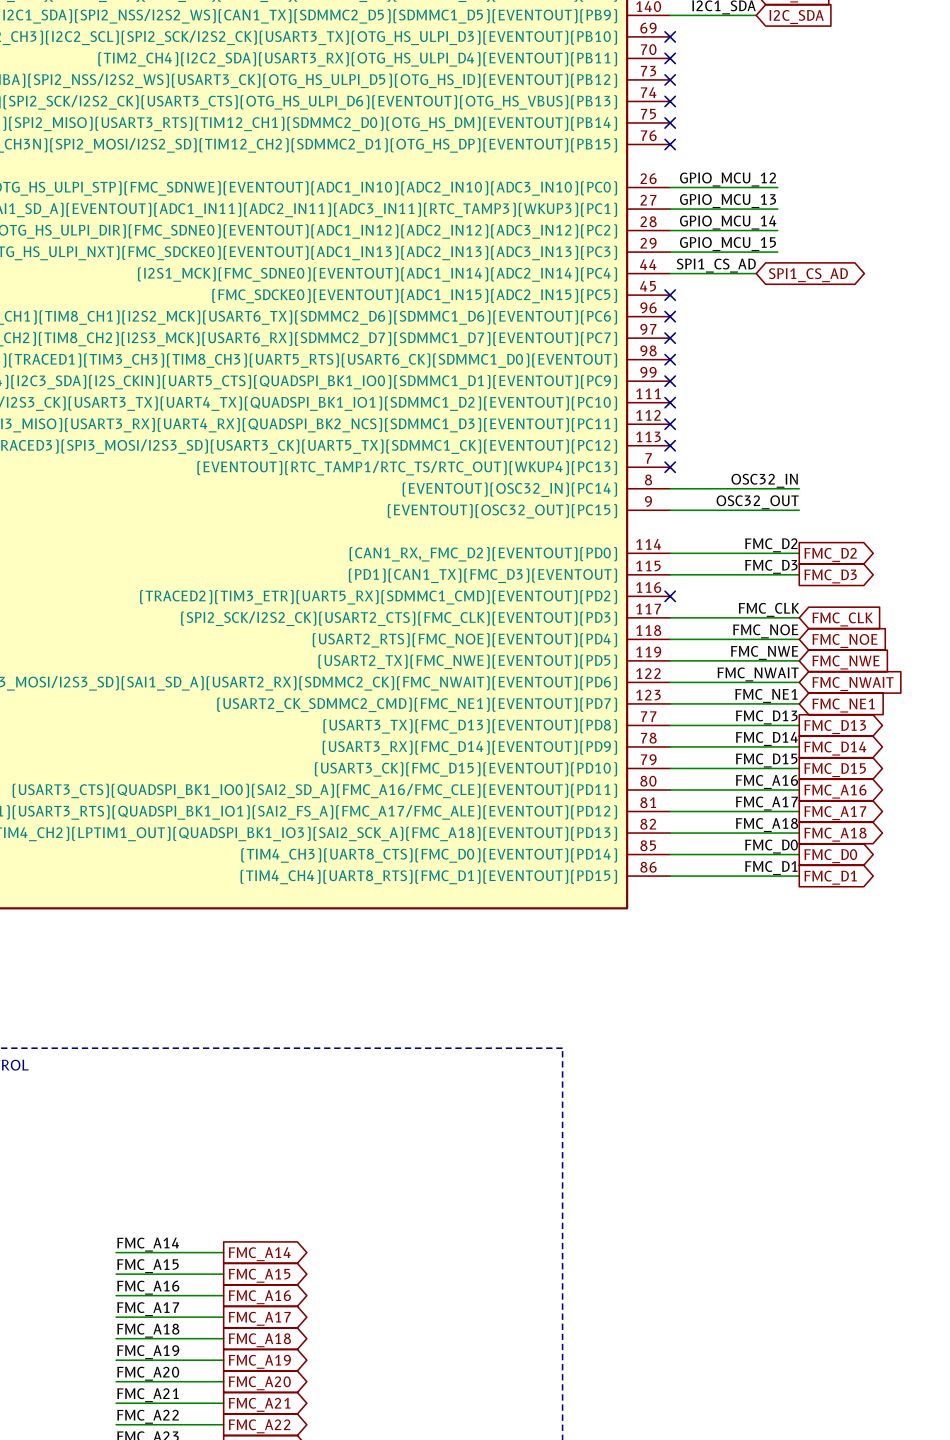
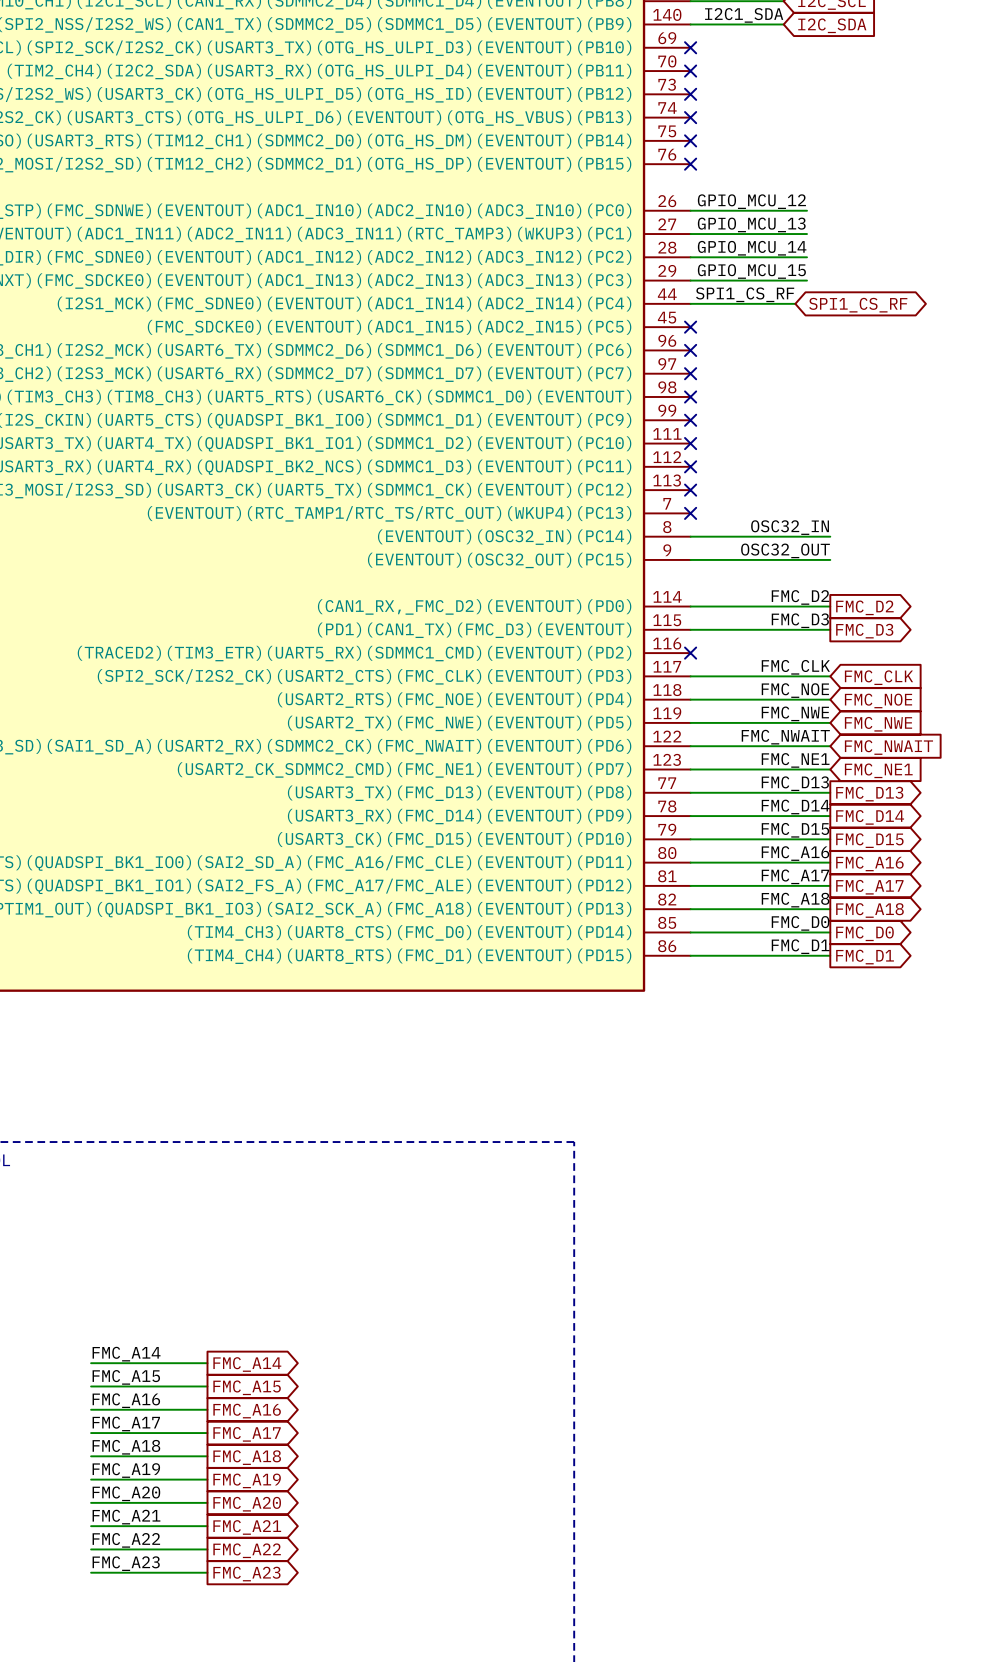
label: SPI1_CS_AD (716, 265) -> SPI1_CS_RF (745, 294)
wire: none -> (783, 303) (795, 303)
global label: SPI1_CS_AD (808, 275) -> SPI1_CS_RF (858, 305)

